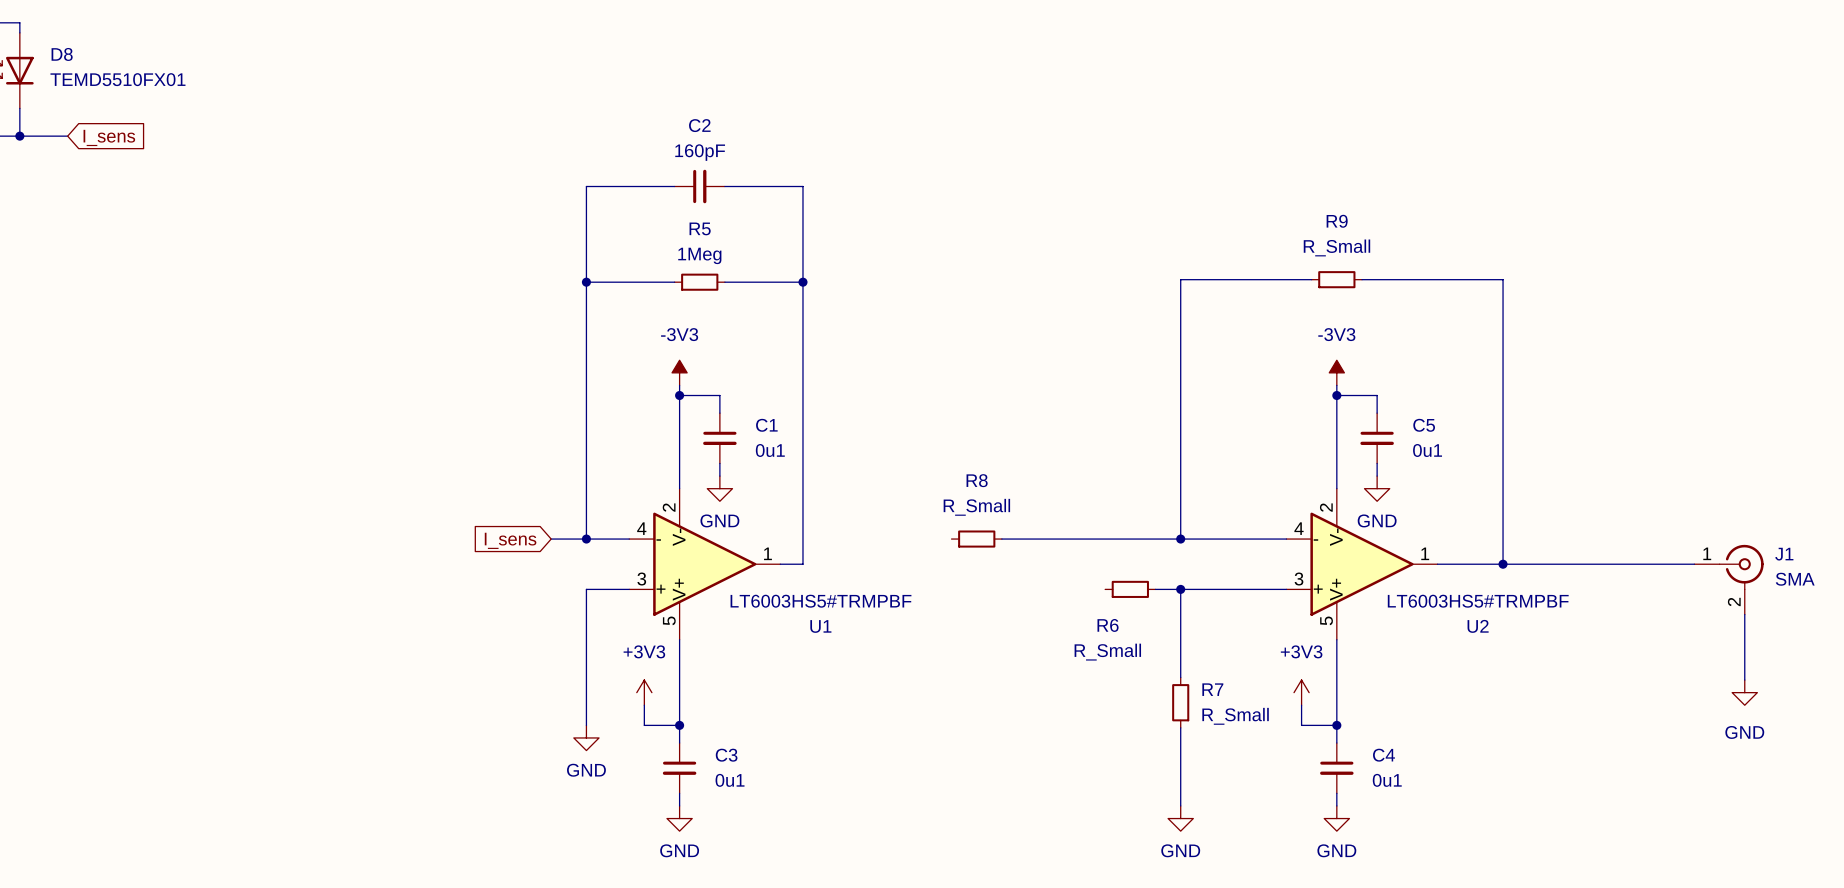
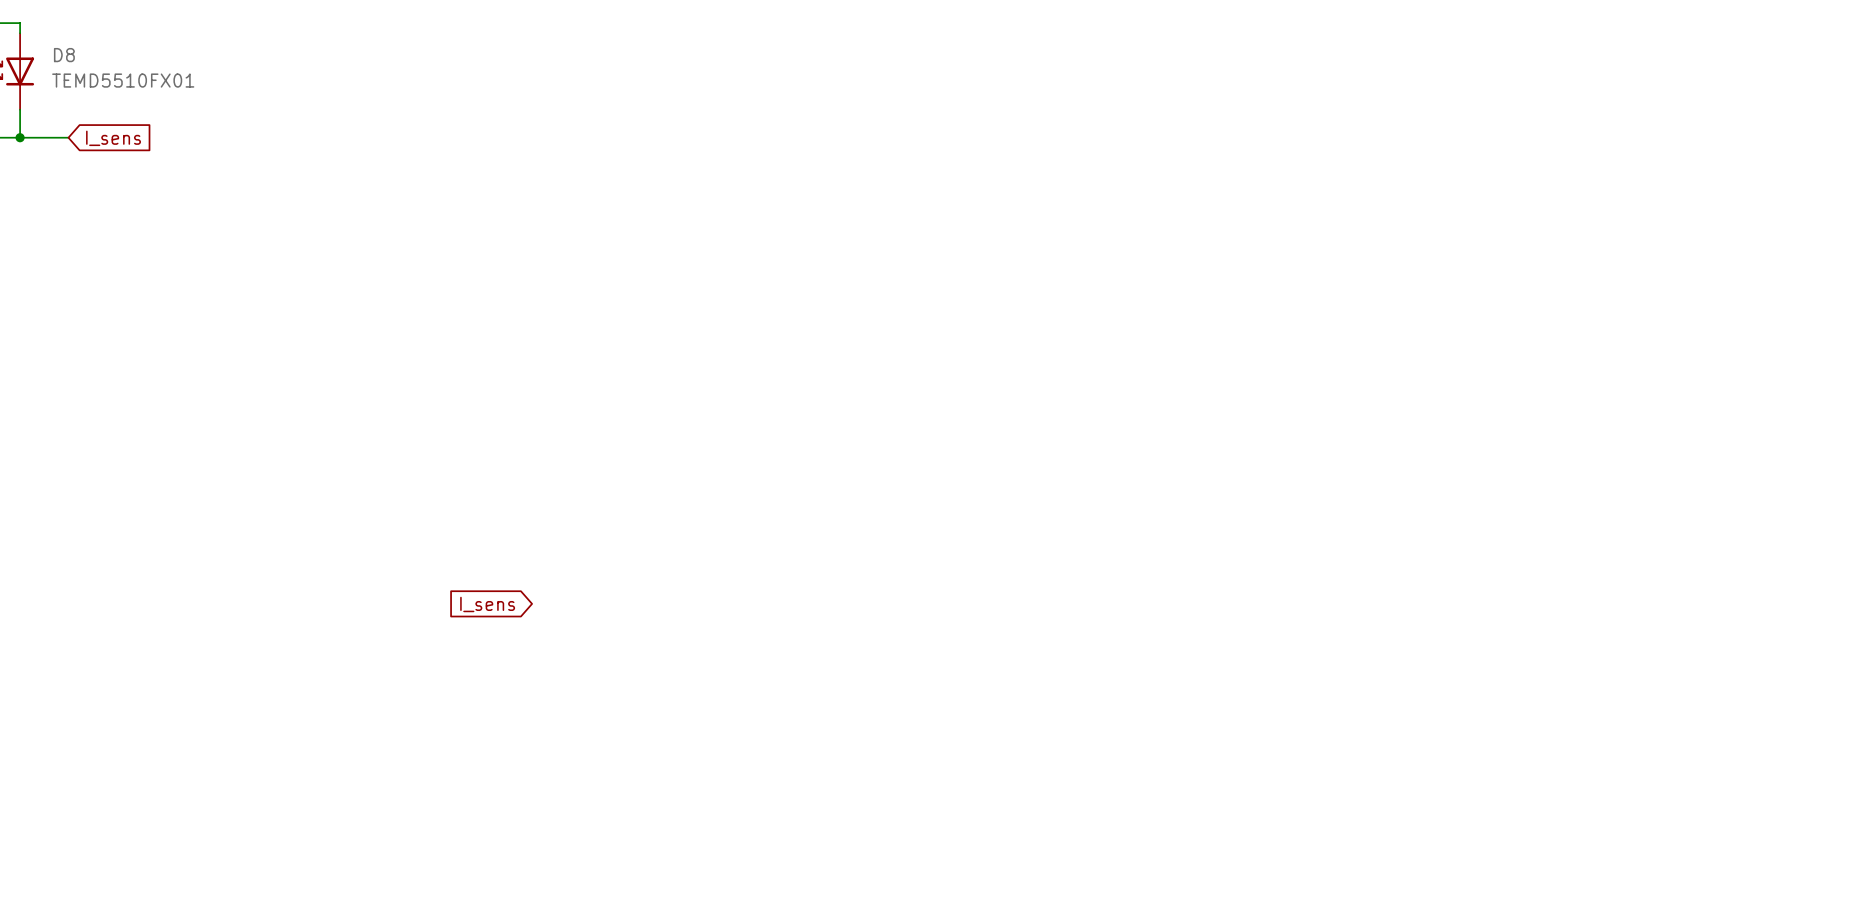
wire: (674, 186) (586, 186) (586, 539) -> none
C2: 160pF (699, 186) -> none
wire: (724, 186) (802, 186) (802, 564) (780, 564) -> none
wire: (1311, 279) (1180, 279) (1180, 539) -> none
R9: R_Small (1336, 279) -> none
wire: (1362, 279) (1503, 279) (1503, 564) -> none
wire: (586, 282) (674, 282) -> none
junction: (586, 282) -> none
R5: 1Meg (699, 282) -> none
wire: (724, 282) (802, 282) -> none
junction: (802, 282) -> none
power symbol: -3V3 (679, 372) -> none
power symbol: -3V3 (1336, 372) -> none
wire: (679, 385) (679, 488) -> none
wire: (1336, 385) (1336, 488) -> none
wire: (679, 395) (719, 395) (719, 413) -> none
junction: (679, 395) -> none
wire: (1336, 395) (1377, 395) (1377, 413) -> none
junction: (1336, 395) -> none
C1: 0u1 (719, 438) -> none
C5: 0u1 (1377, 438) -> none
wire: (719, 463) (719, 476) -> none
wire: (1377, 463) (1377, 476) -> none
power symbol: GND (719, 488) -> none
power symbol: GND (1377, 488) -> none
wire: (551, 539) (629, 539) -> none
junction: (586, 539) -> none
R8: R_Small (976, 539) -> none
wire: (1001, 539) (1286, 539) -> none
junction: (1180, 539) -> none
global label position: I_sens (510, 540) -> I_sens (487, 604)
U1: LT6003HS5#TRMPBF (704, 564) -> none
U2: LT6003HS5#TRMPBF (1362, 564) -> none
wire: (1437, 564) (1694, 564) -> none
junction: (1503, 564) -> none
J1: SMA (1729, 579) -> none
wire: (629, 589) (586, 589) (586, 725) -> none
R6: R_Small (1130, 589) -> none
wire: (1155, 589) (1286, 589) -> none
wire: (1180, 589) (1180, 677) -> none
junction: (1180, 589) -> none
wire: (1744, 614) (1744, 680) -> none
wire: (679, 639) (679, 743) -> none
wire: (1336, 639) (1336, 743) -> none
power symbol: +3V3 (644, 692) -> none
power symbol: +3V3 (1301, 692) -> none
power symbol: GND (1744, 692) -> none
R7: R_Small (1180, 702) -> none
wire: (644, 705) (644, 725) (679, 725) -> none
wire: (1301, 705) (1301, 725) (1336, 725) -> none
junction: (679, 725) -> none
junction: (1336, 725) -> none
wire: (1180, 727) (1180, 805) -> none
power symbol: GND (586, 737) -> none
C3: 0u1 (679, 768) -> none
C4: 0u1 (1336, 768) -> none
wire: (679, 793) (679, 805) -> none
wire: (1336, 793) (1336, 805) -> none
power symbol: GND (679, 818) -> none
power symbol: GND (1180, 818) -> none
power symbol: GND (1336, 818) -> none

